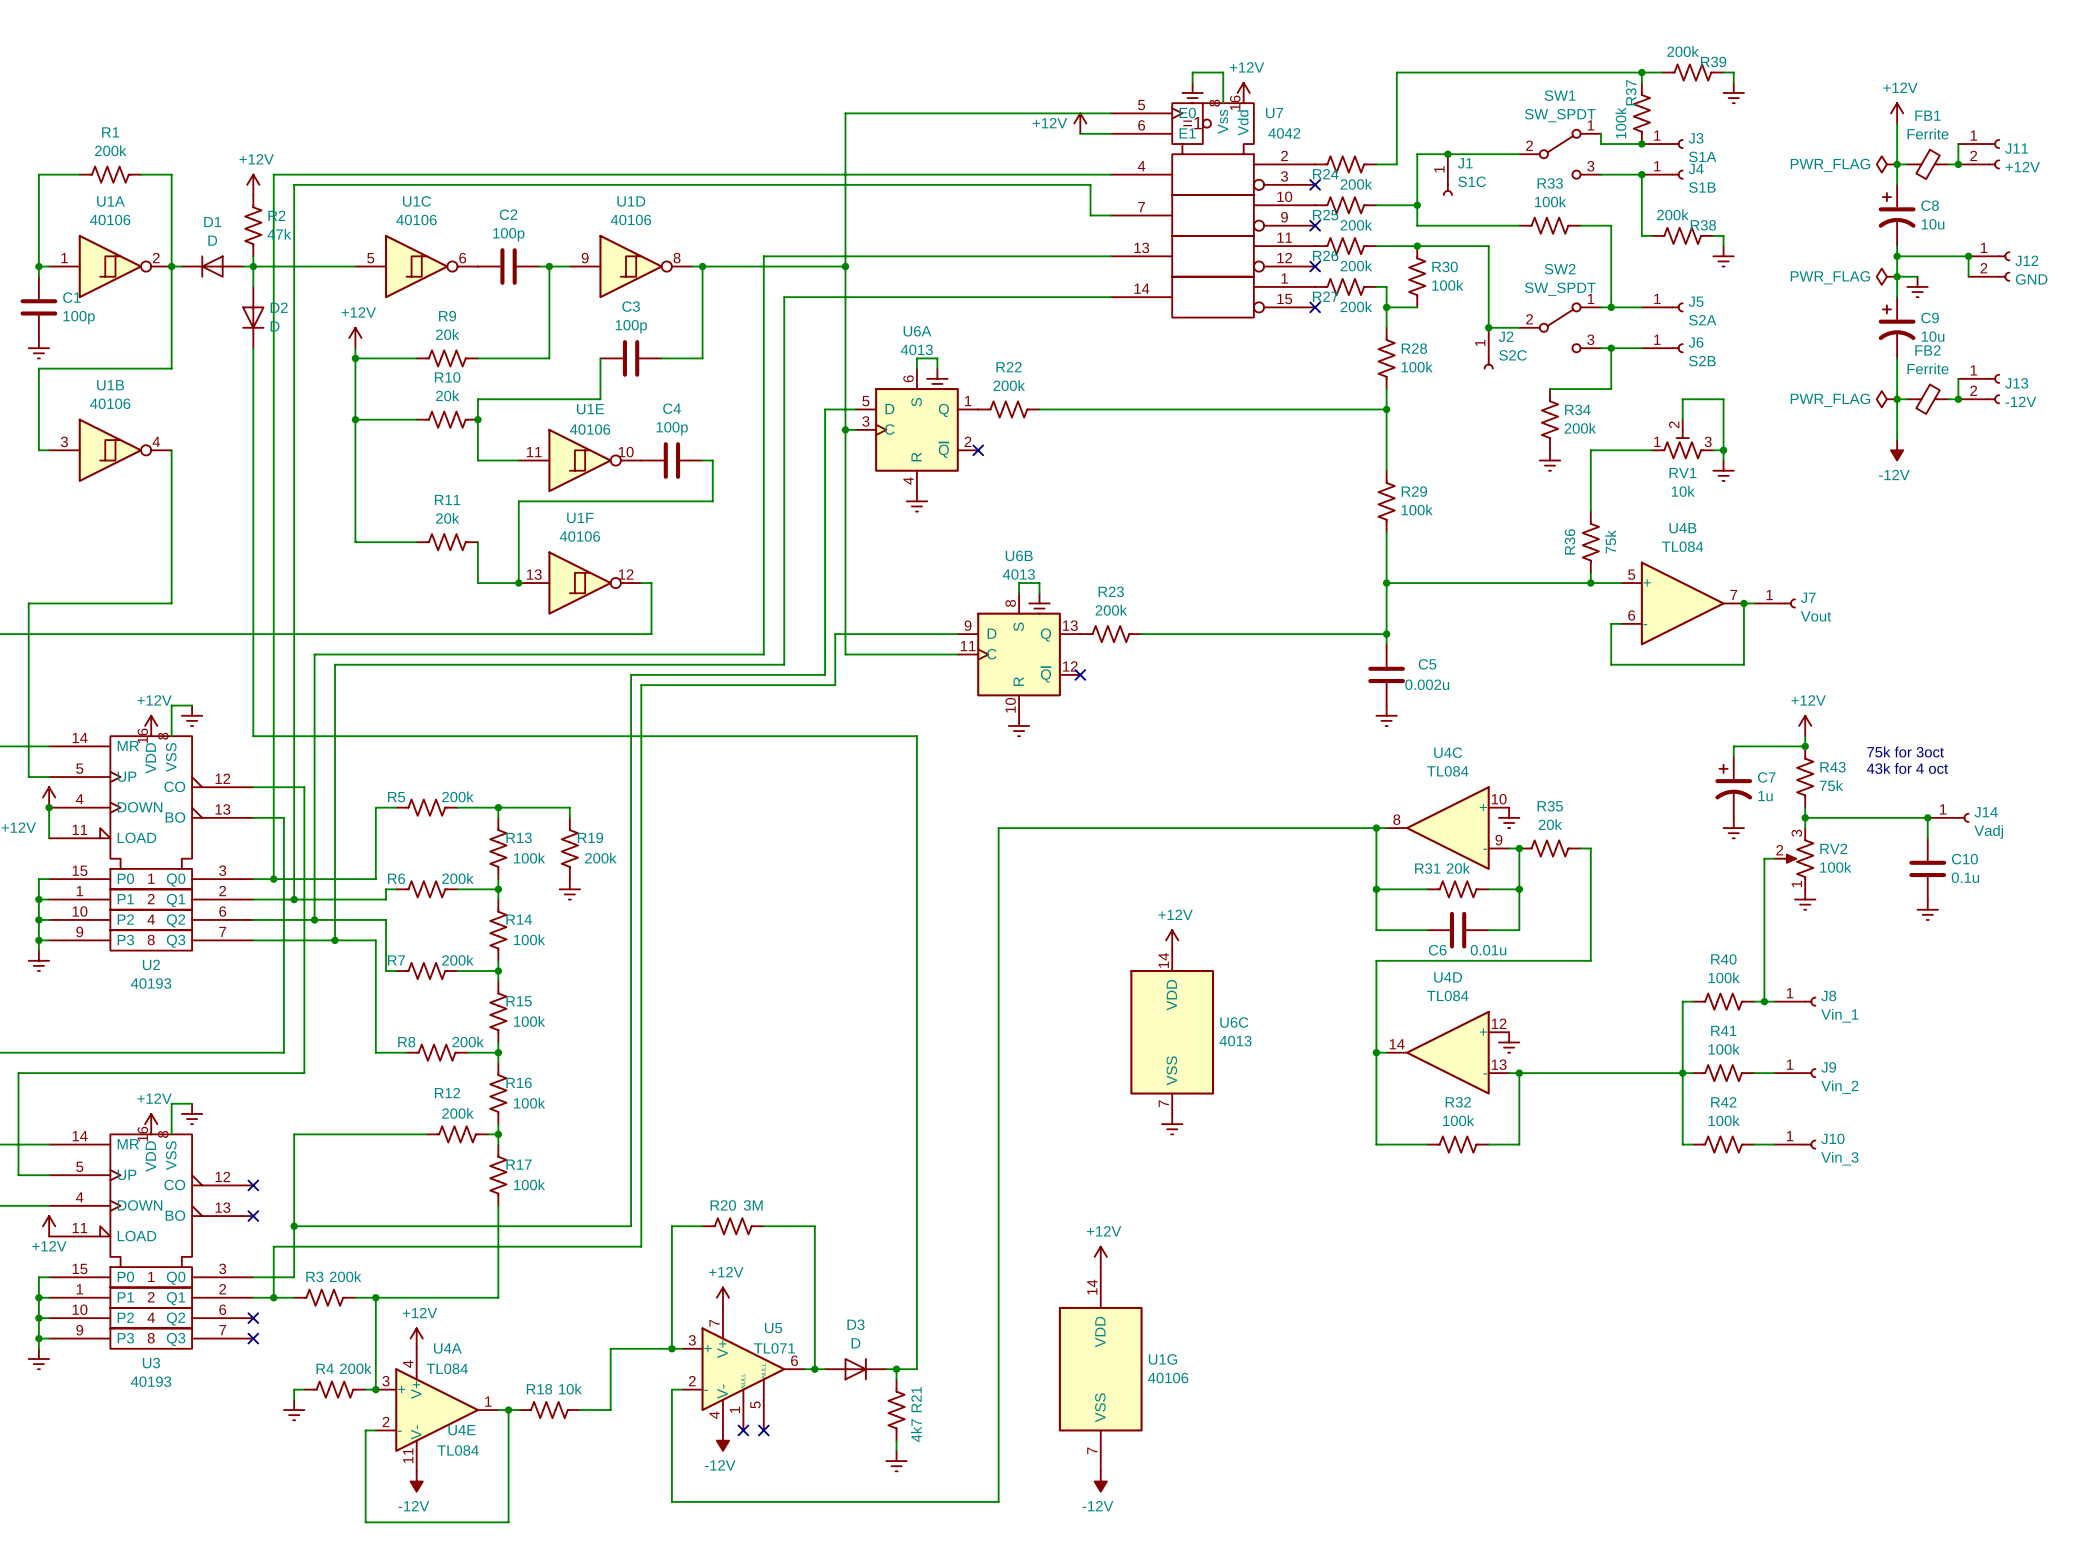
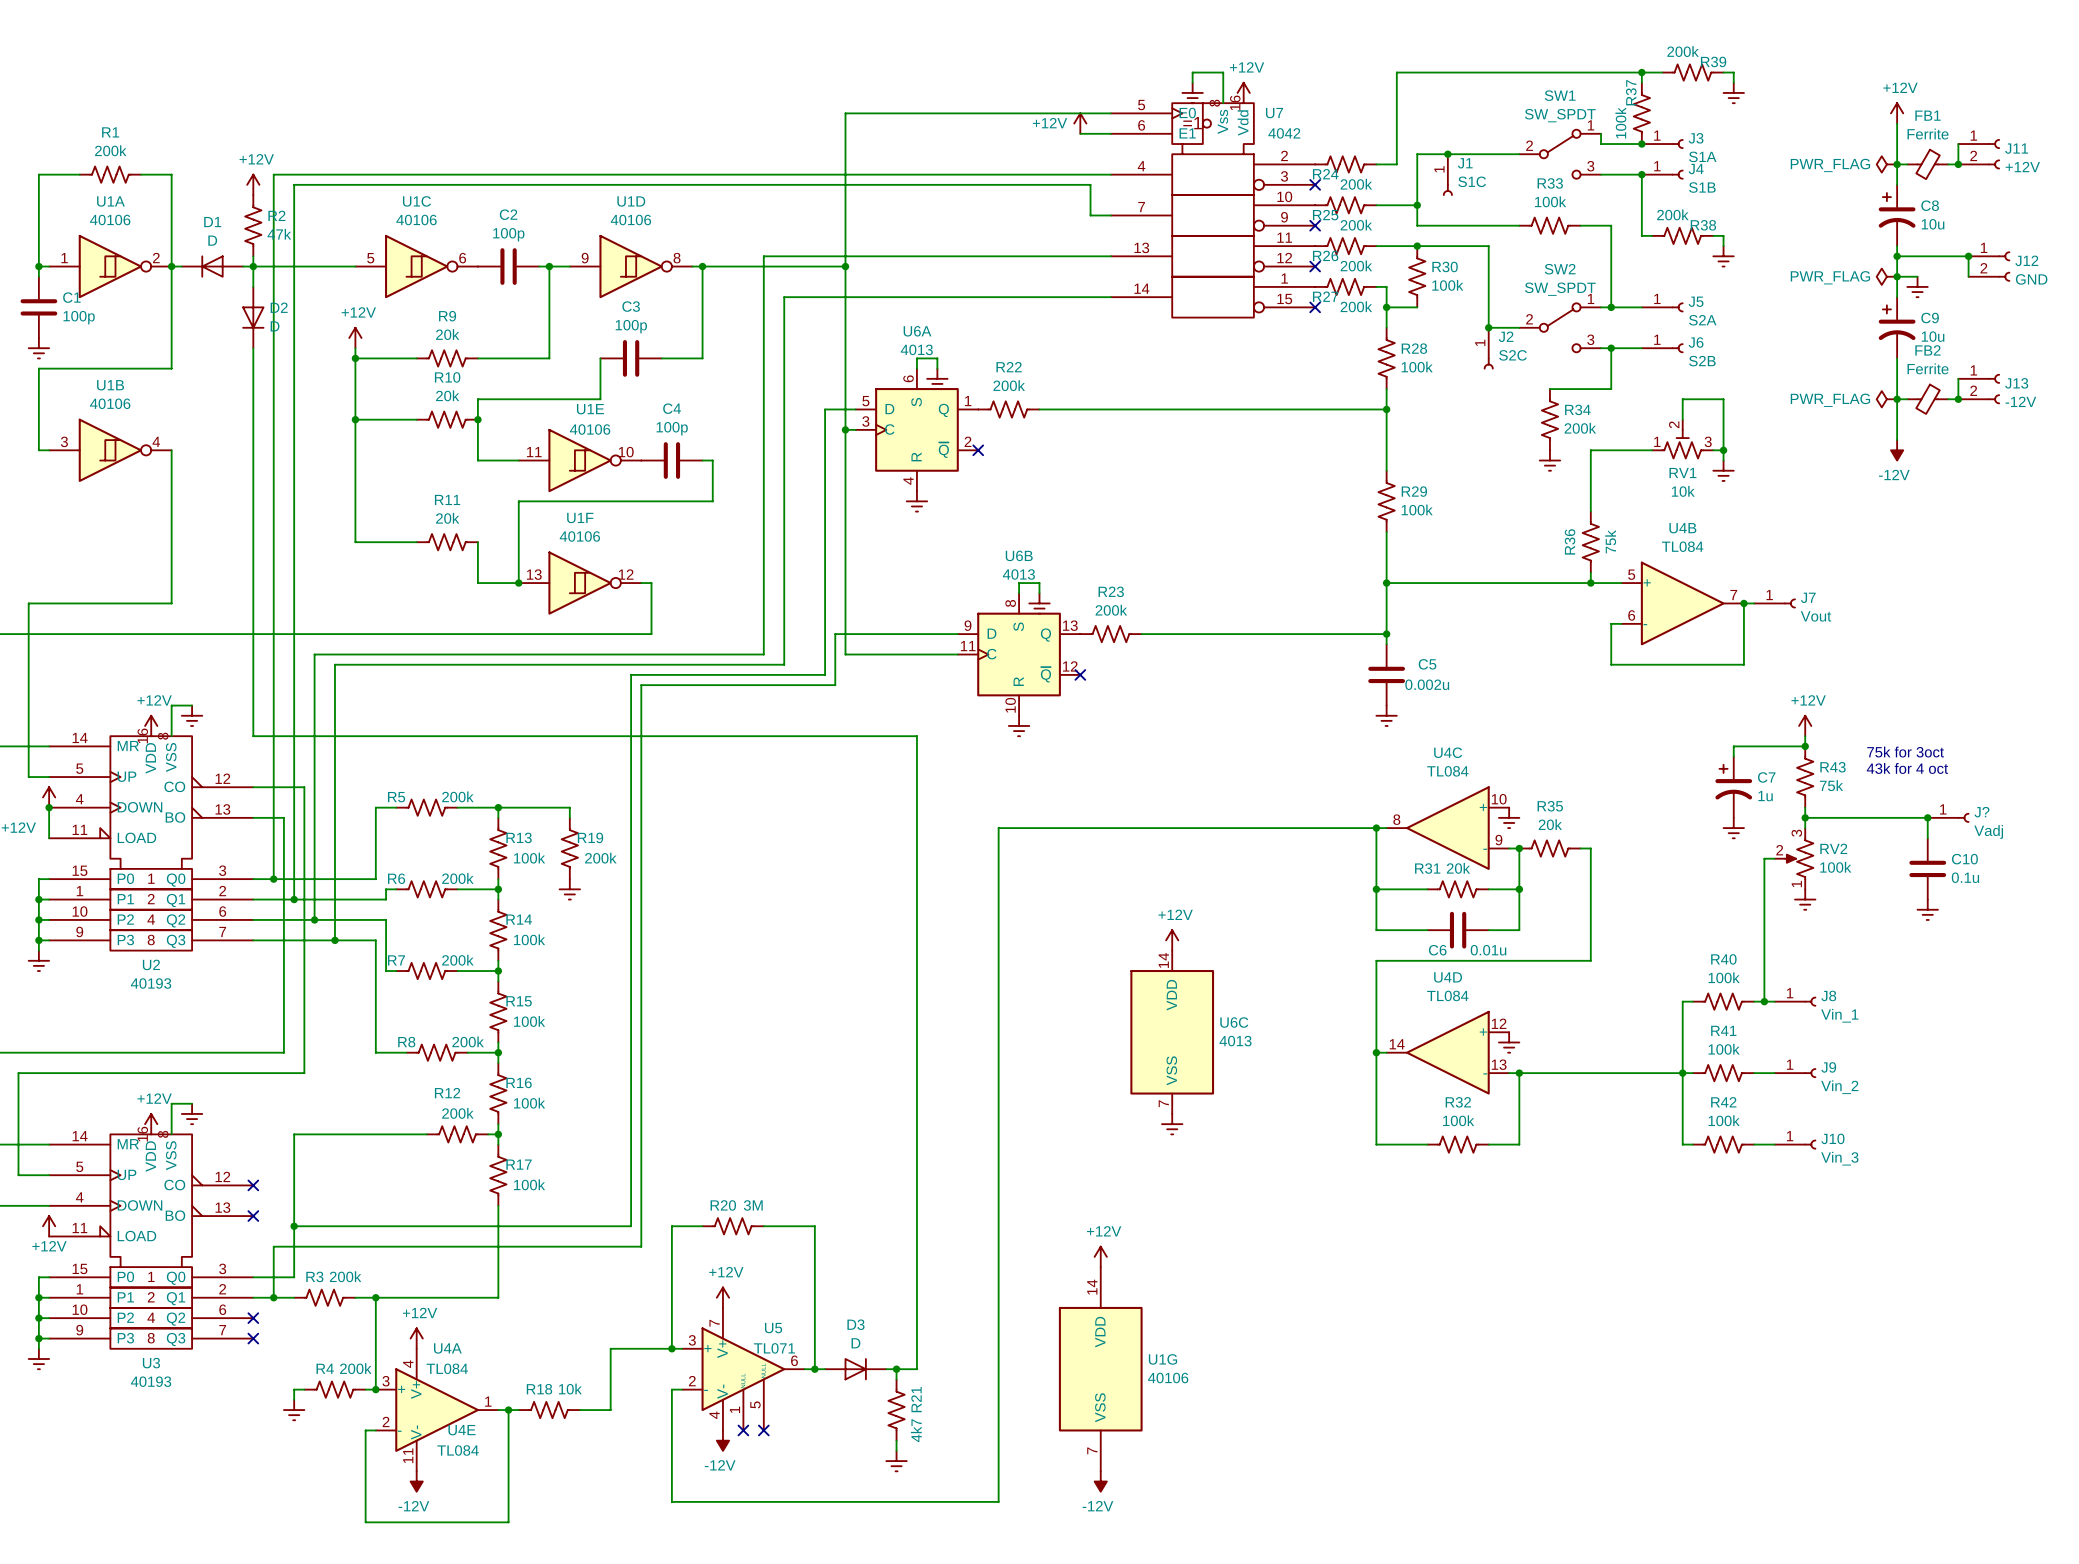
J14 name: J14 (1986, 812) -> J? (1981, 812)

